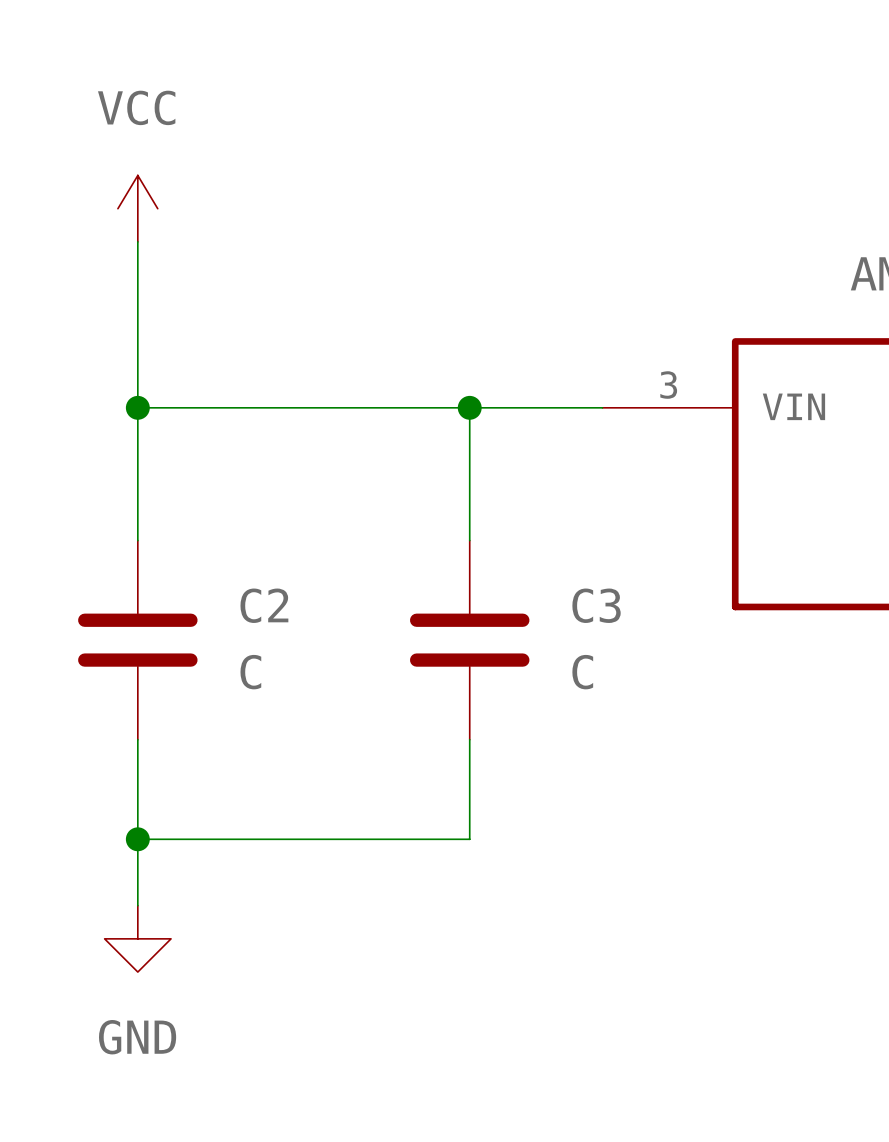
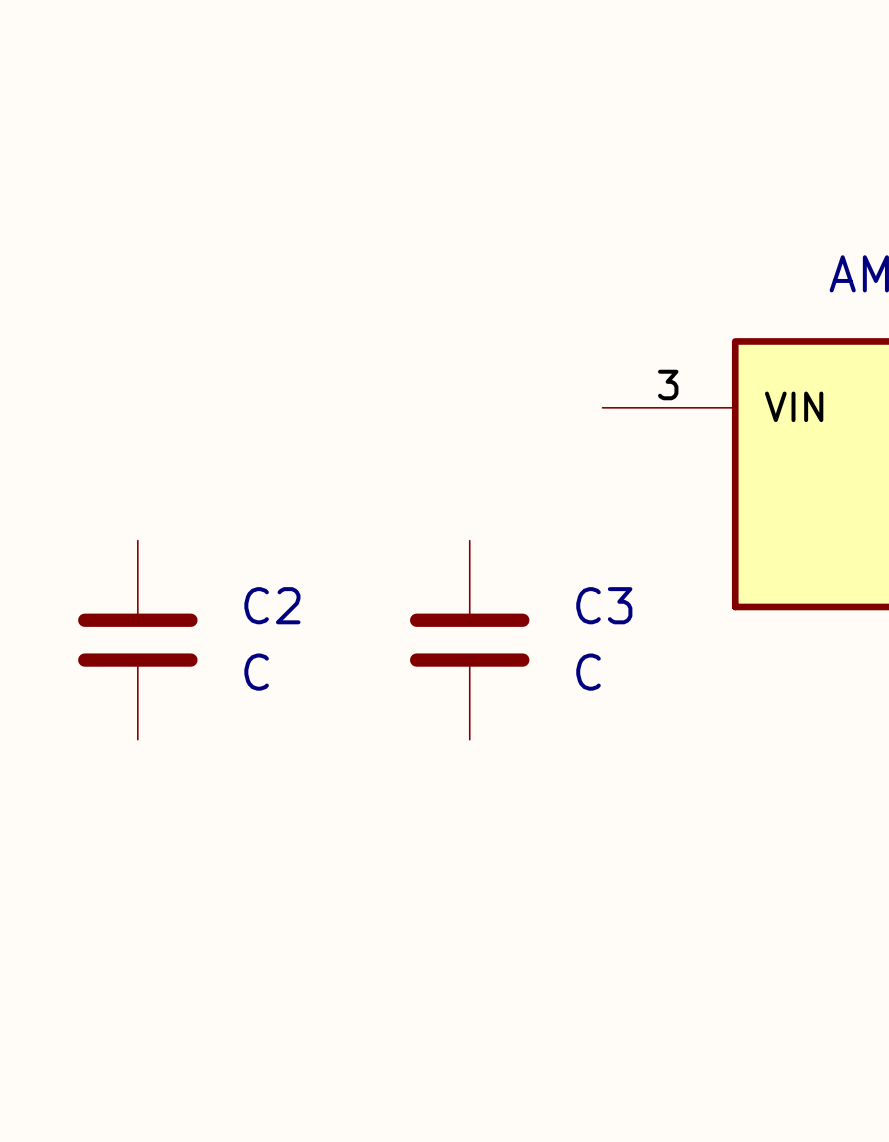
power symbol: VCC (137, 208) -> none
wire: (137, 241) (137, 540) -> none
wire: (137, 407) (602, 407) -> none
junction: (137, 407) -> none
wire: (469, 407) (469, 540) -> none
junction: (469, 407) -> none
wire: (137, 739) (137, 905) -> none
wire: (469, 739) (469, 839) (137, 839) -> none
junction: (137, 839) -> none
power symbol: GND (137, 938) -> none

